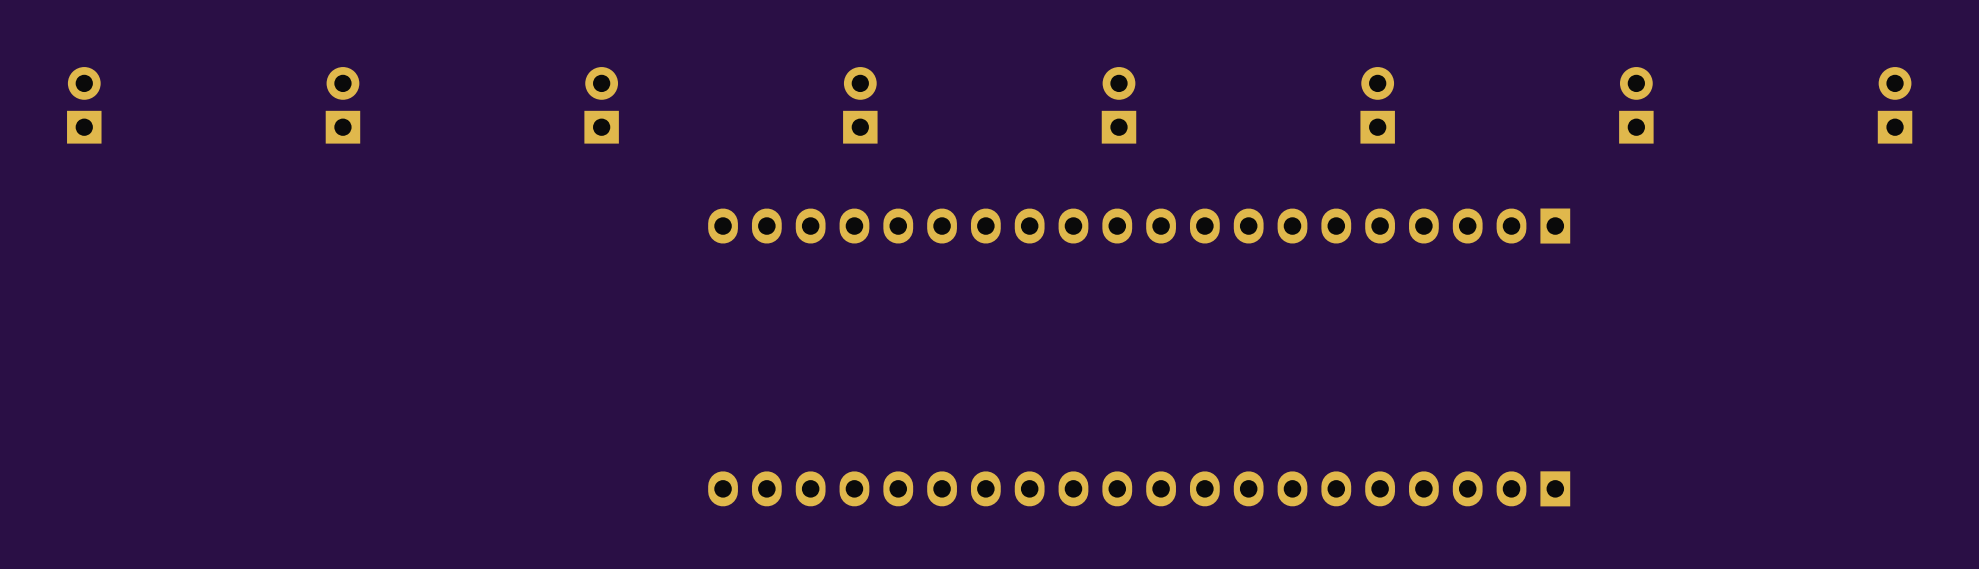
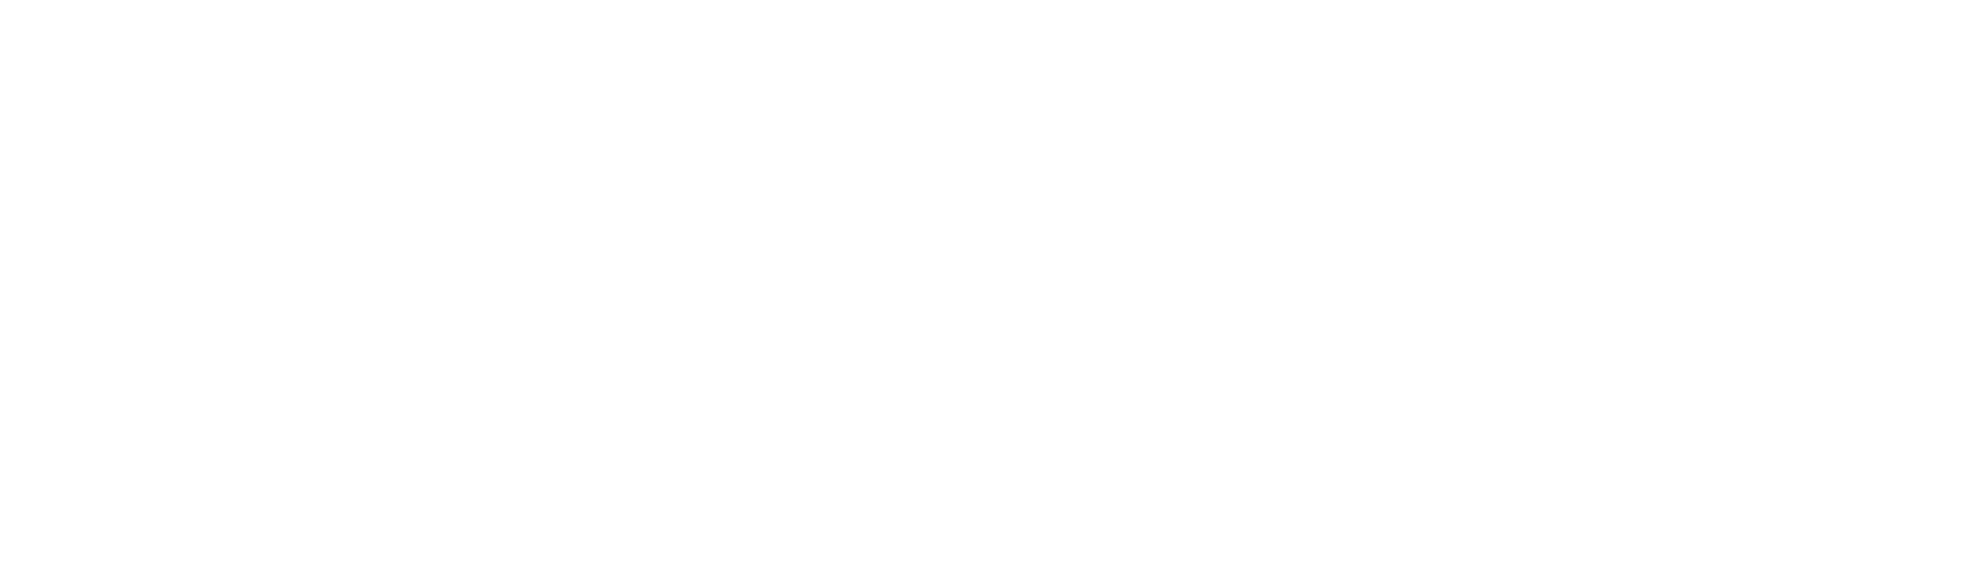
part: (84, 105) -> none
part: (342, 105) -> none
part: (601, 105) -> none
part: (860, 105) -> none
part: (1119, 105) -> none
part: (1377, 105) -> none
part: (1636, 105) -> none
part: (1895, 105) -> none
part: (1139, 226) -> none
part: (1139, 488) -> none

